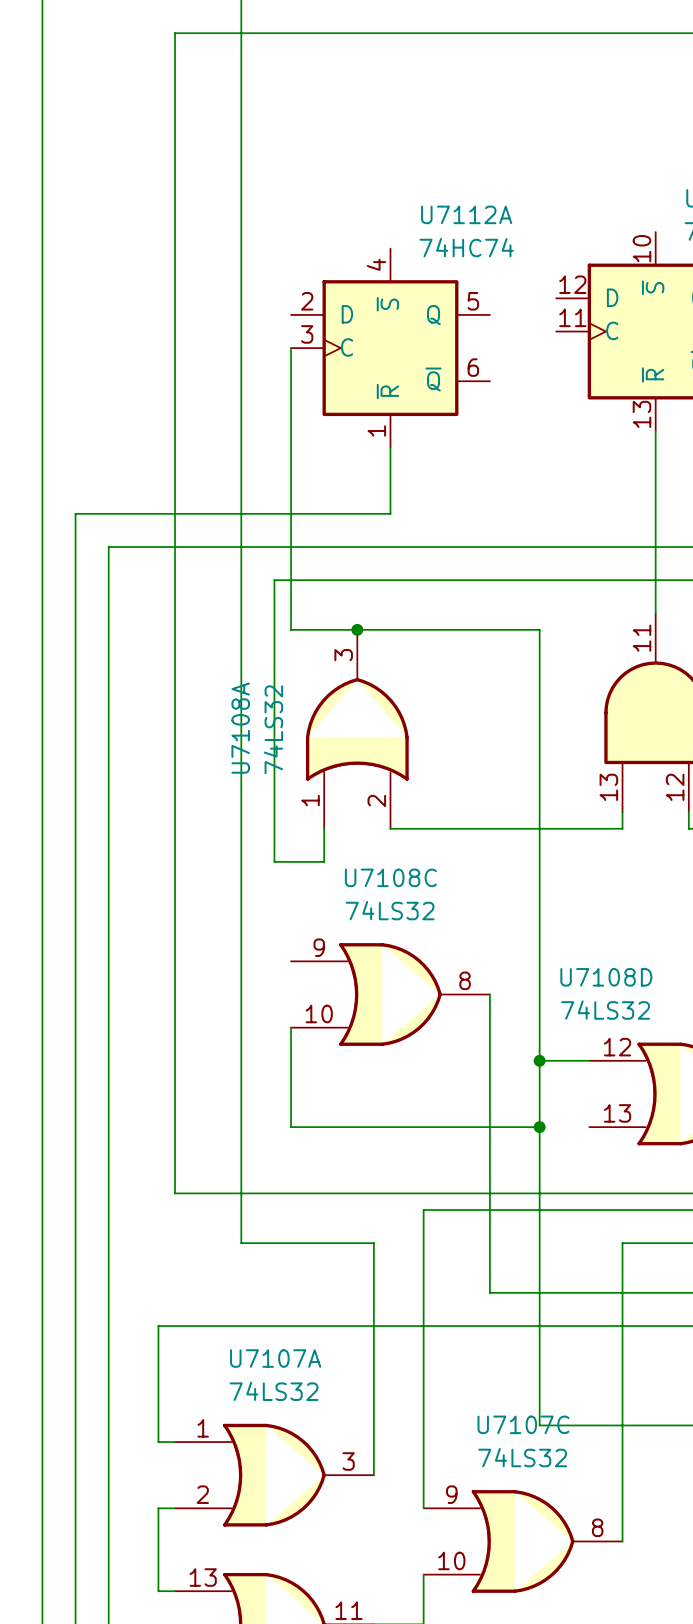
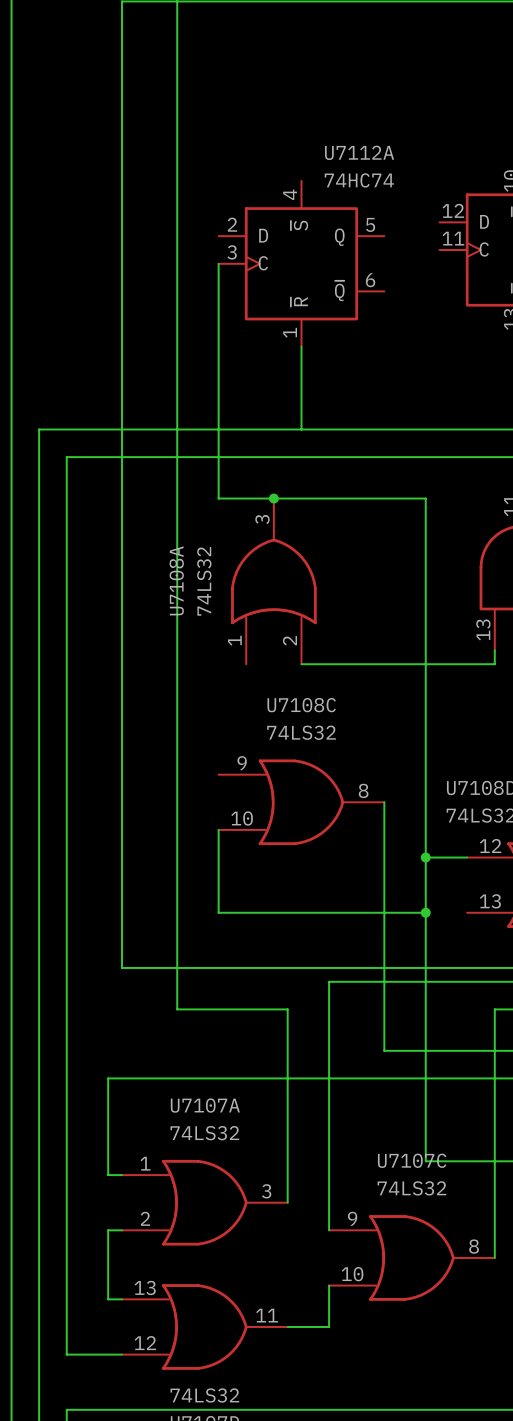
wire: (390, 513) (75, 513) (75, 547) -> (301, 401) (301, 429)
wire: (108, 547) (108, 580) -> (66, 429) (39, 429)
wire: (274, 580) (274, 861) (324, 861) (324, 828) -> (204, 457) (66, 457)

